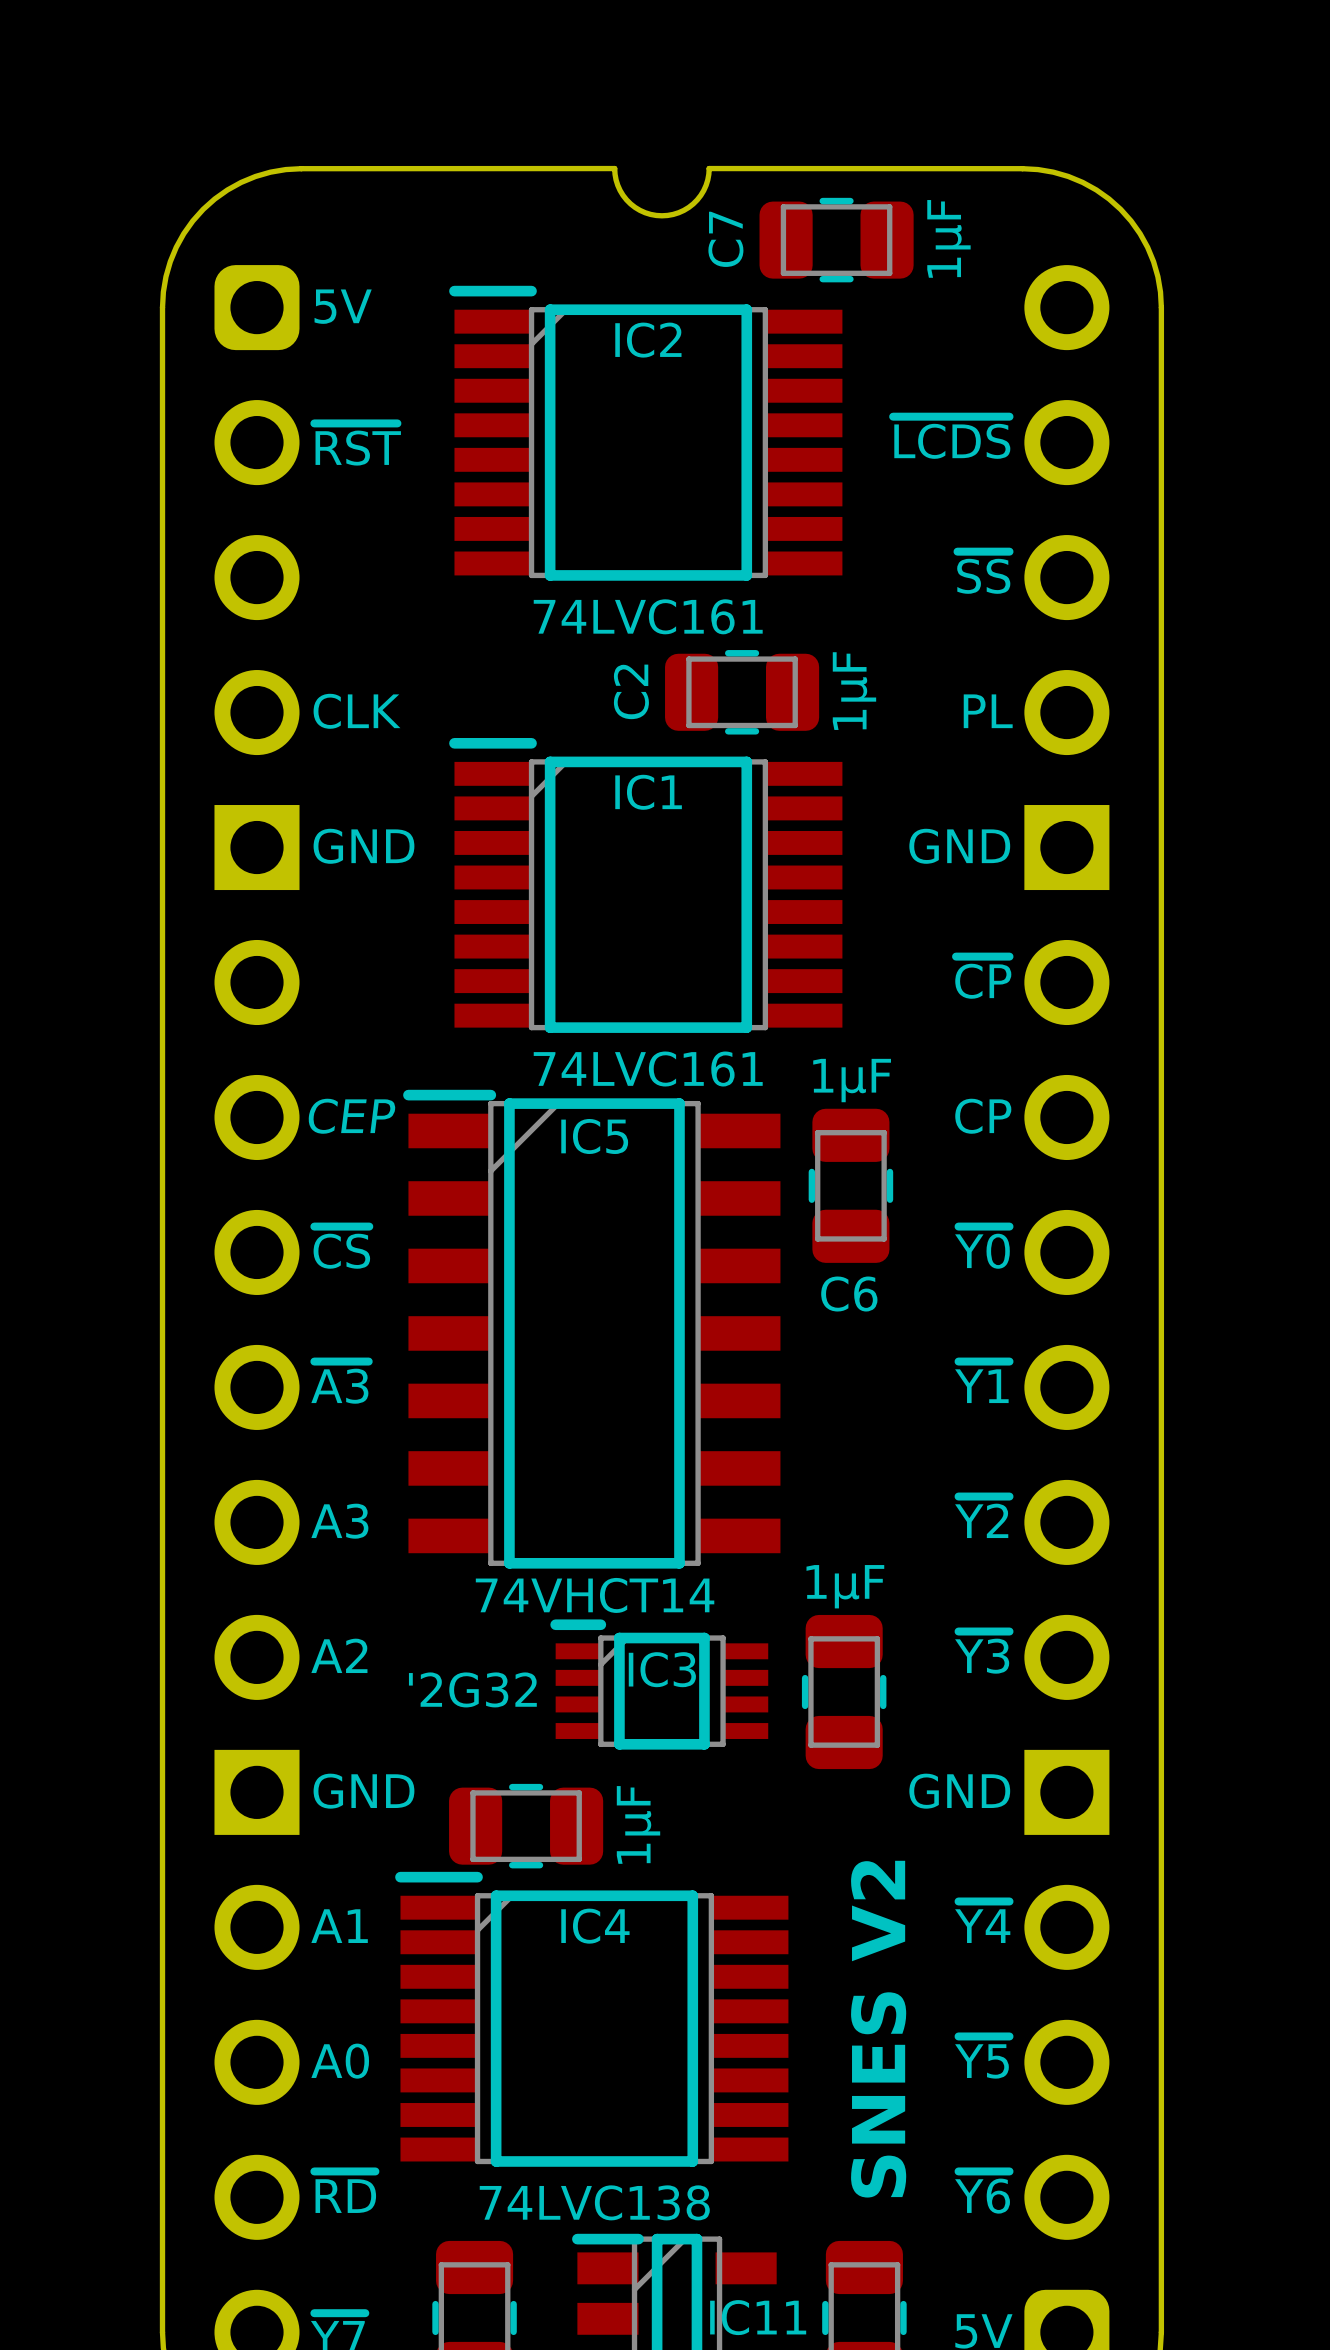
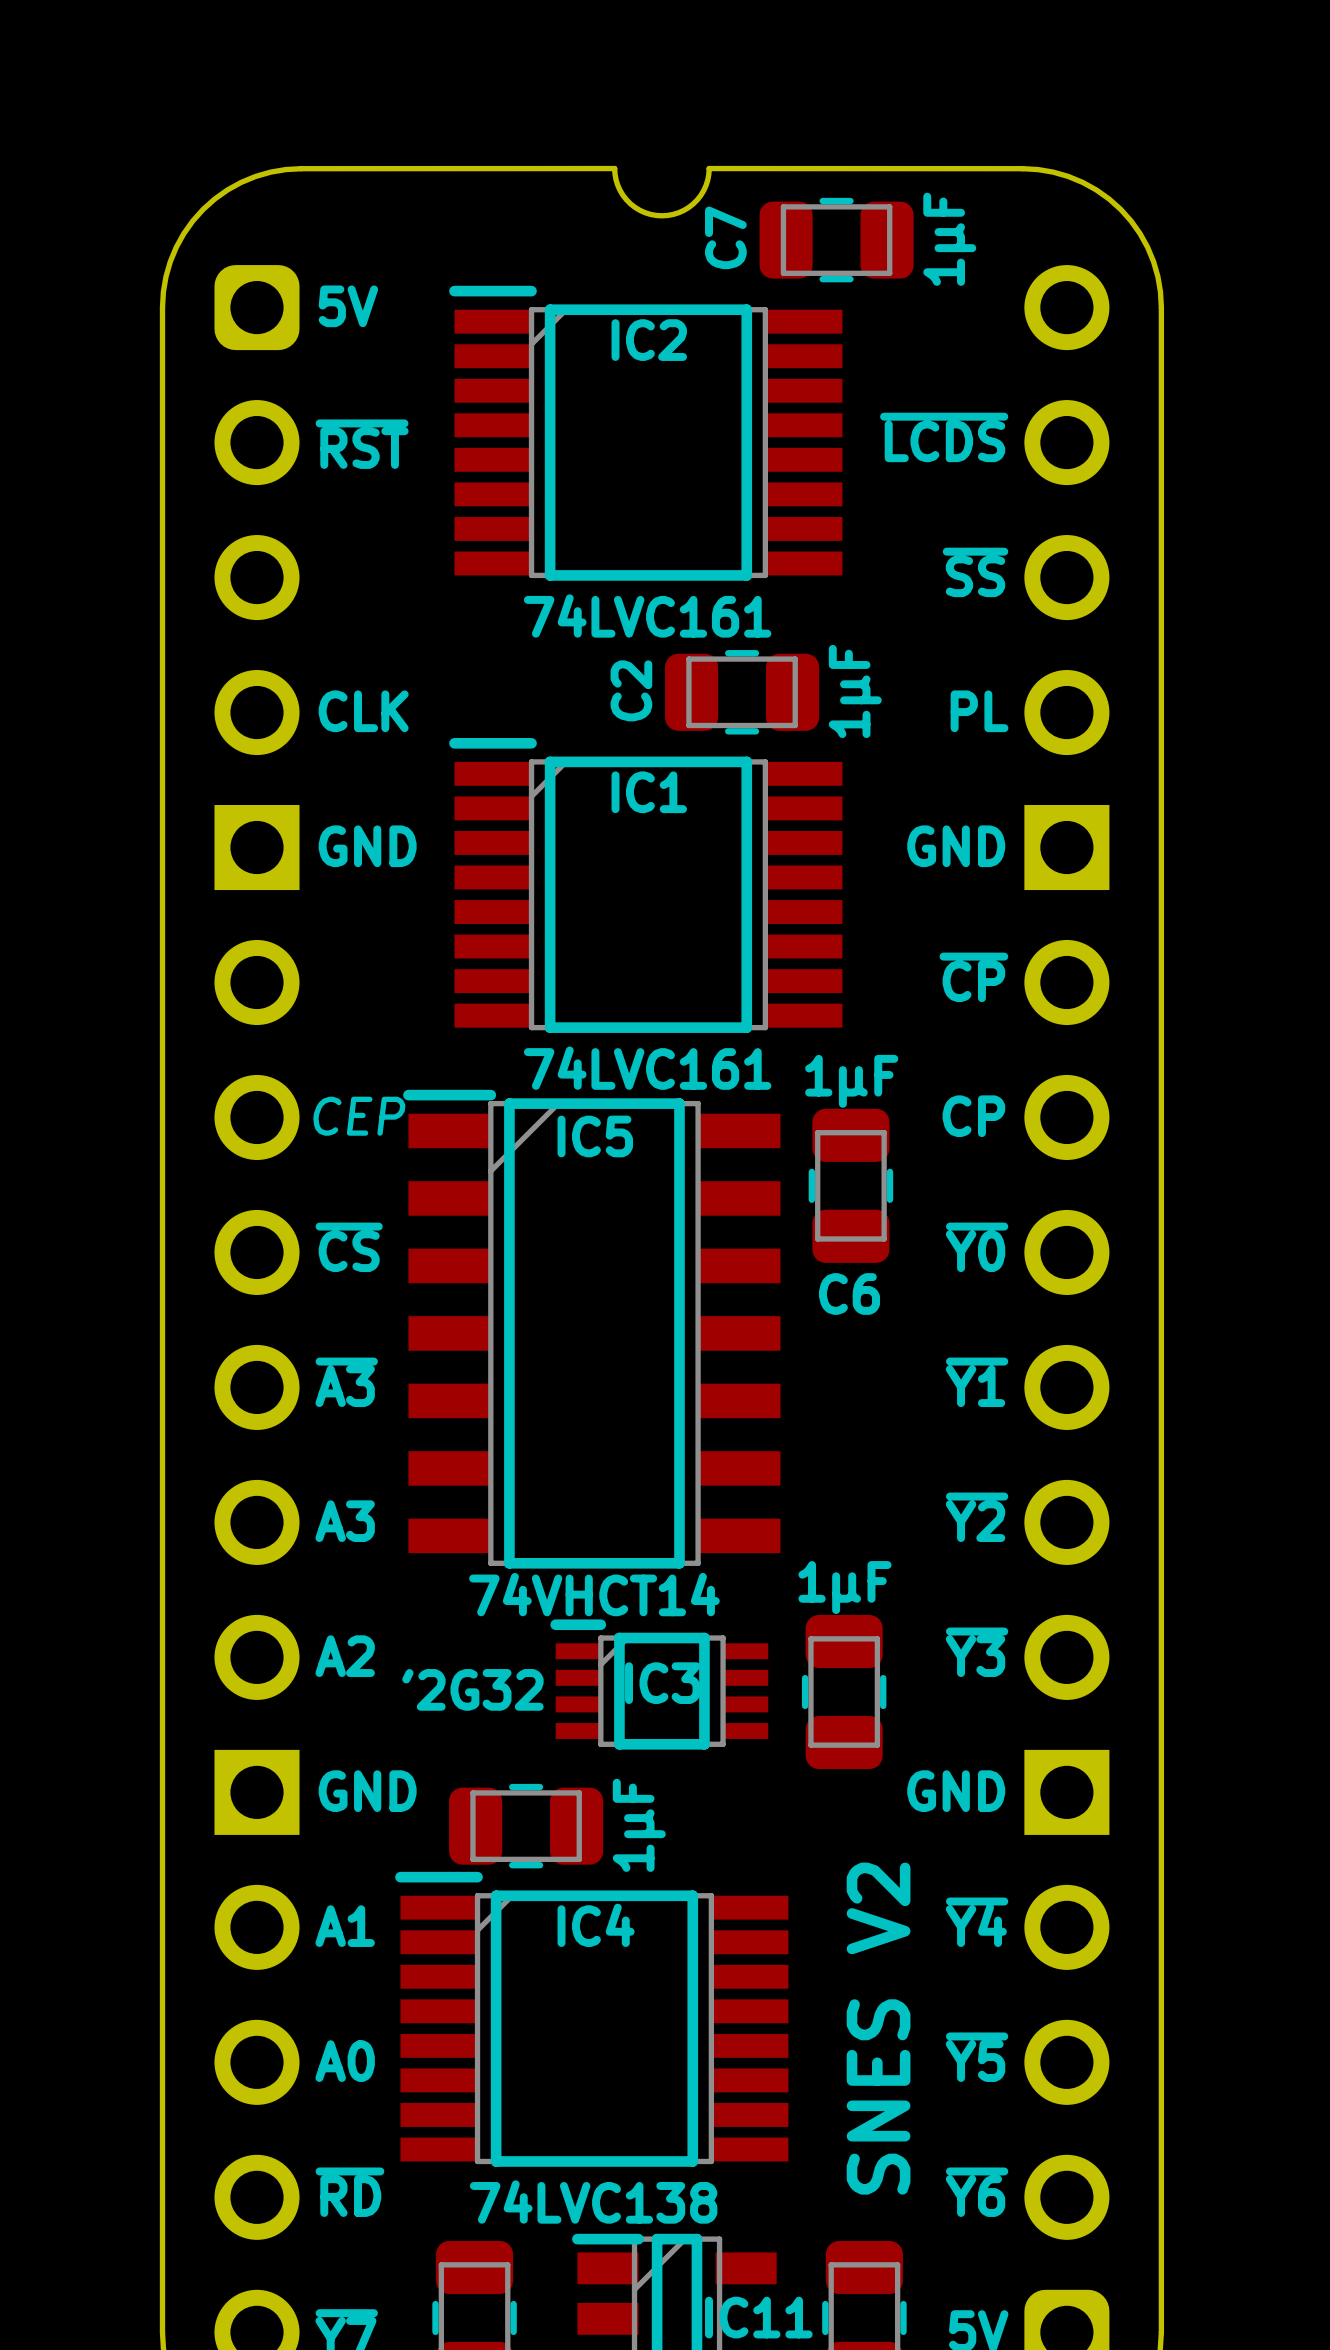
IC3 name position: IC3 (662, 1669) -> IC3 (662, 1683)

